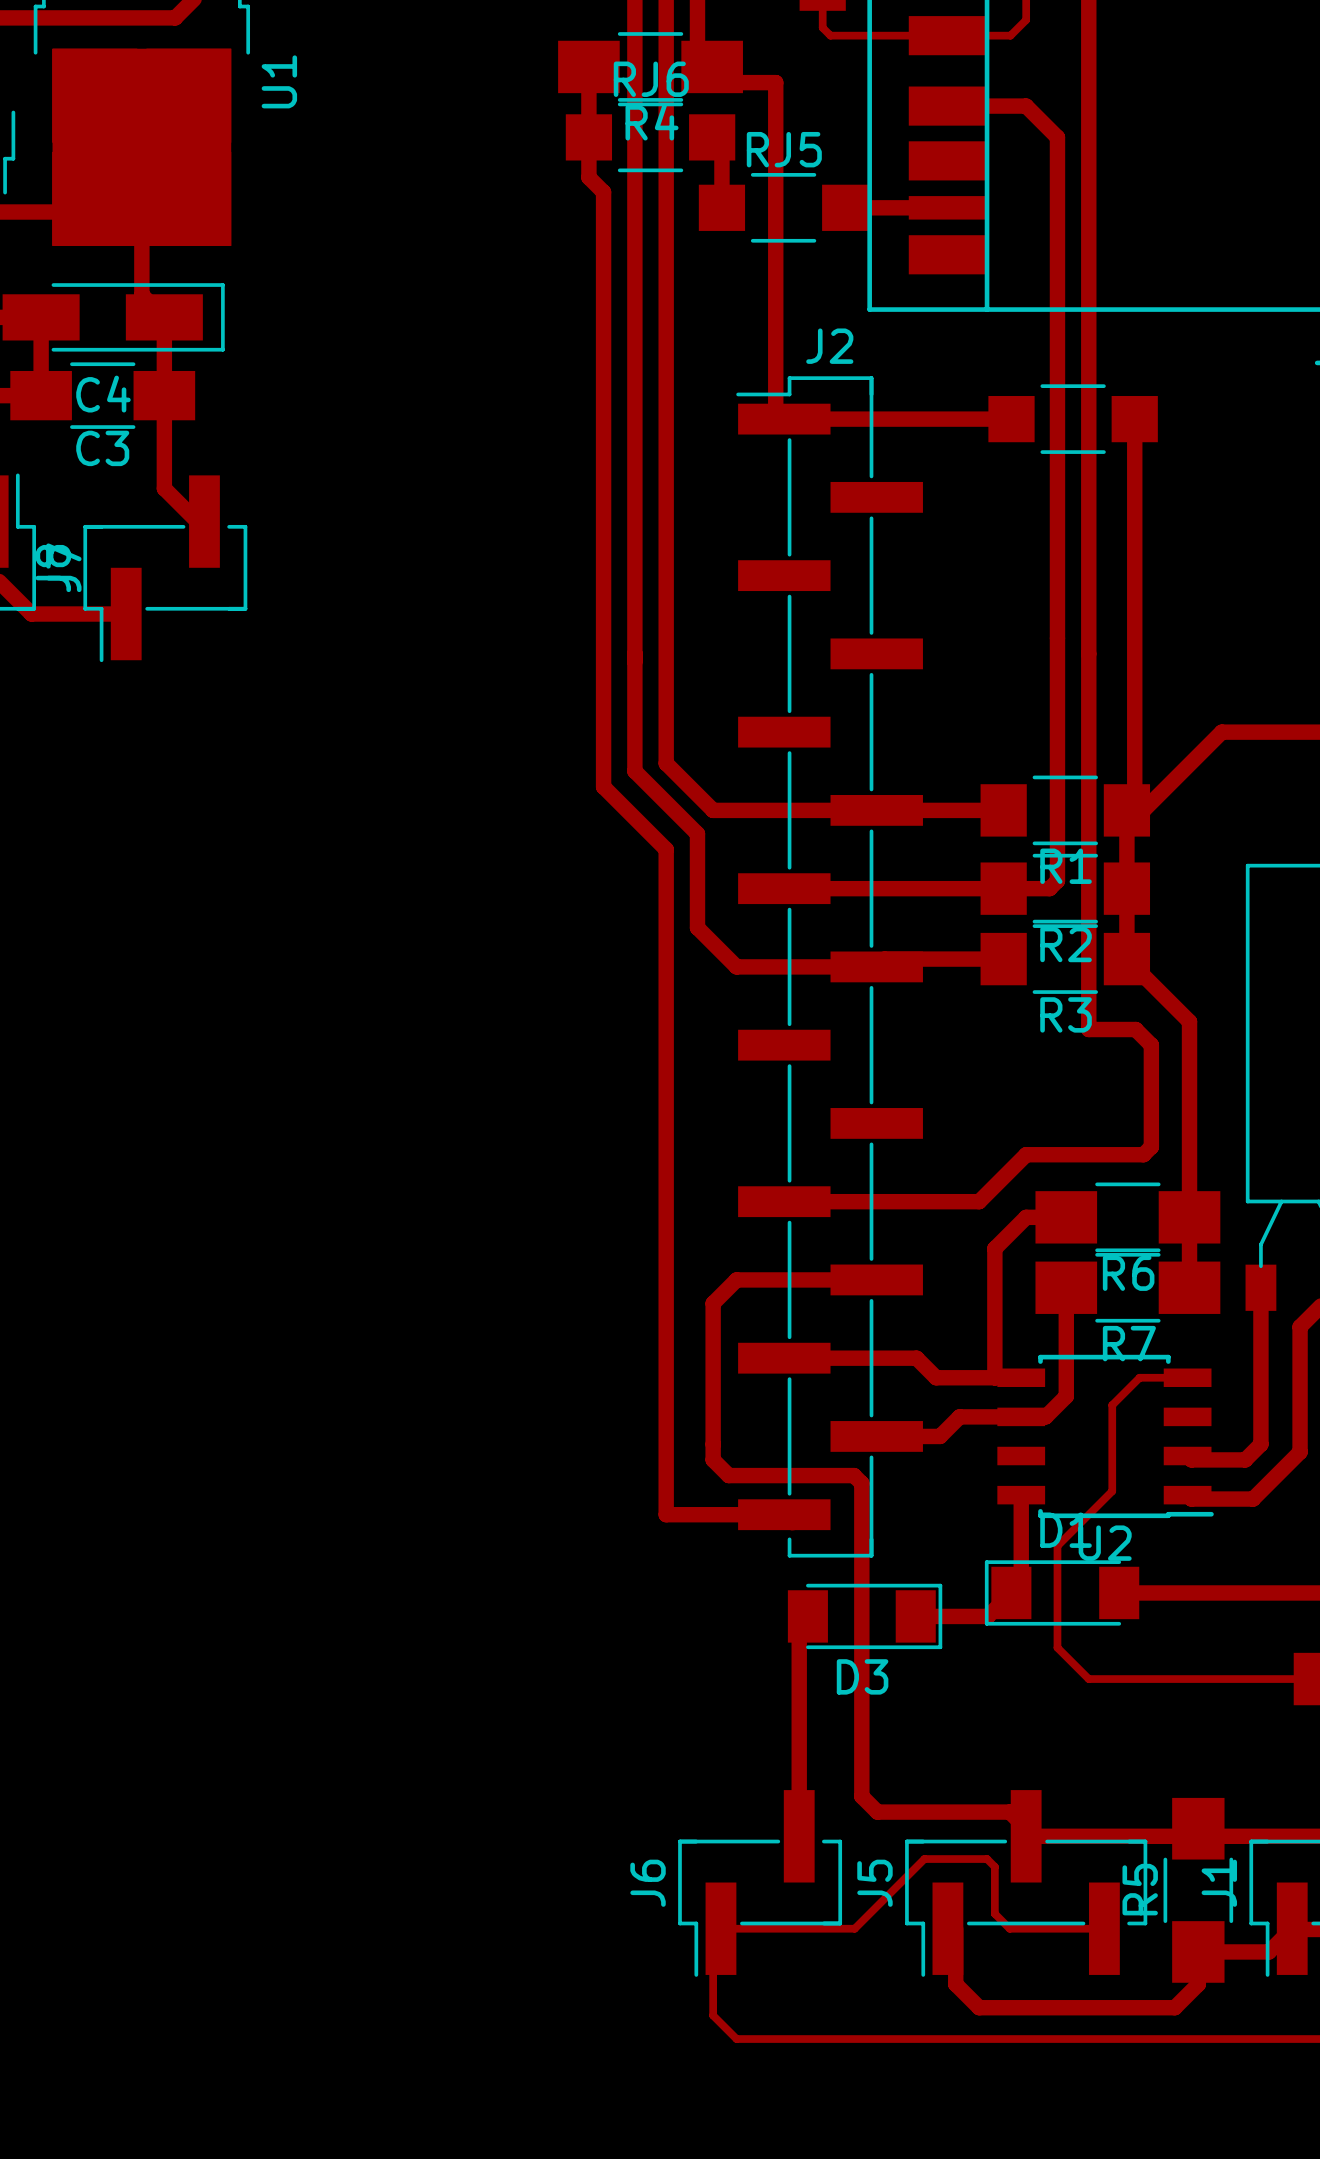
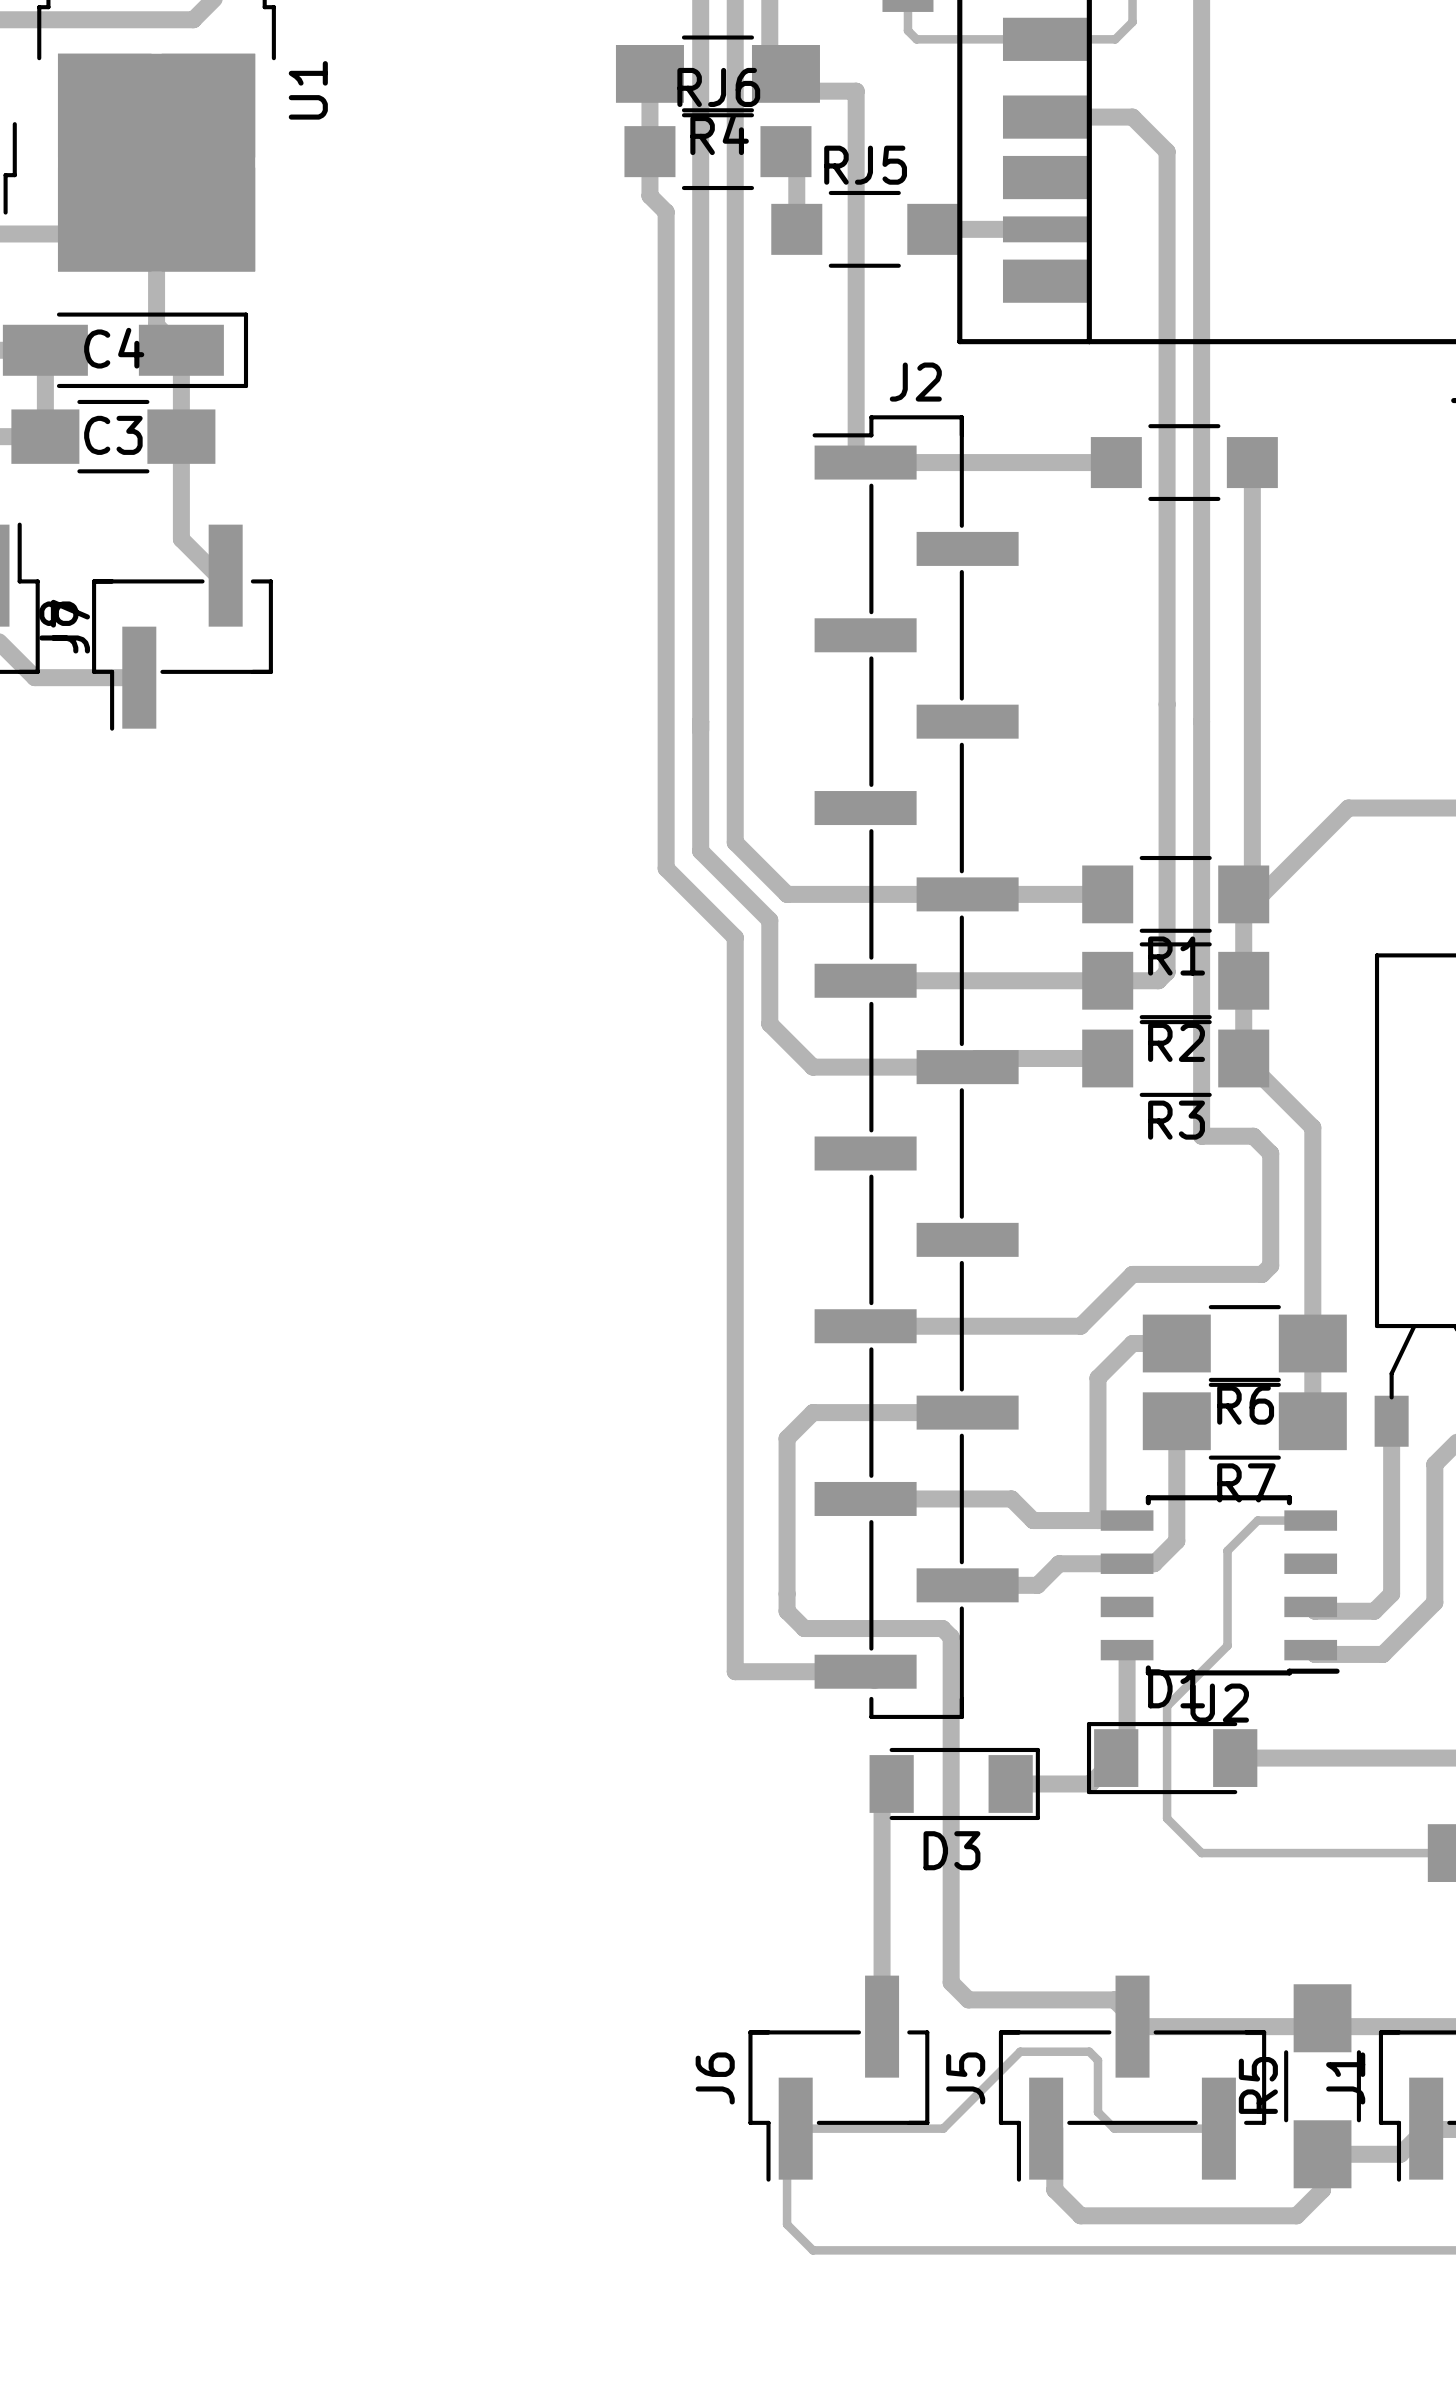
C4 name position: C4 (103, 394) -> C4 (114, 348)
C3 name position: C3 (102, 448) -> C3 (113, 435)

